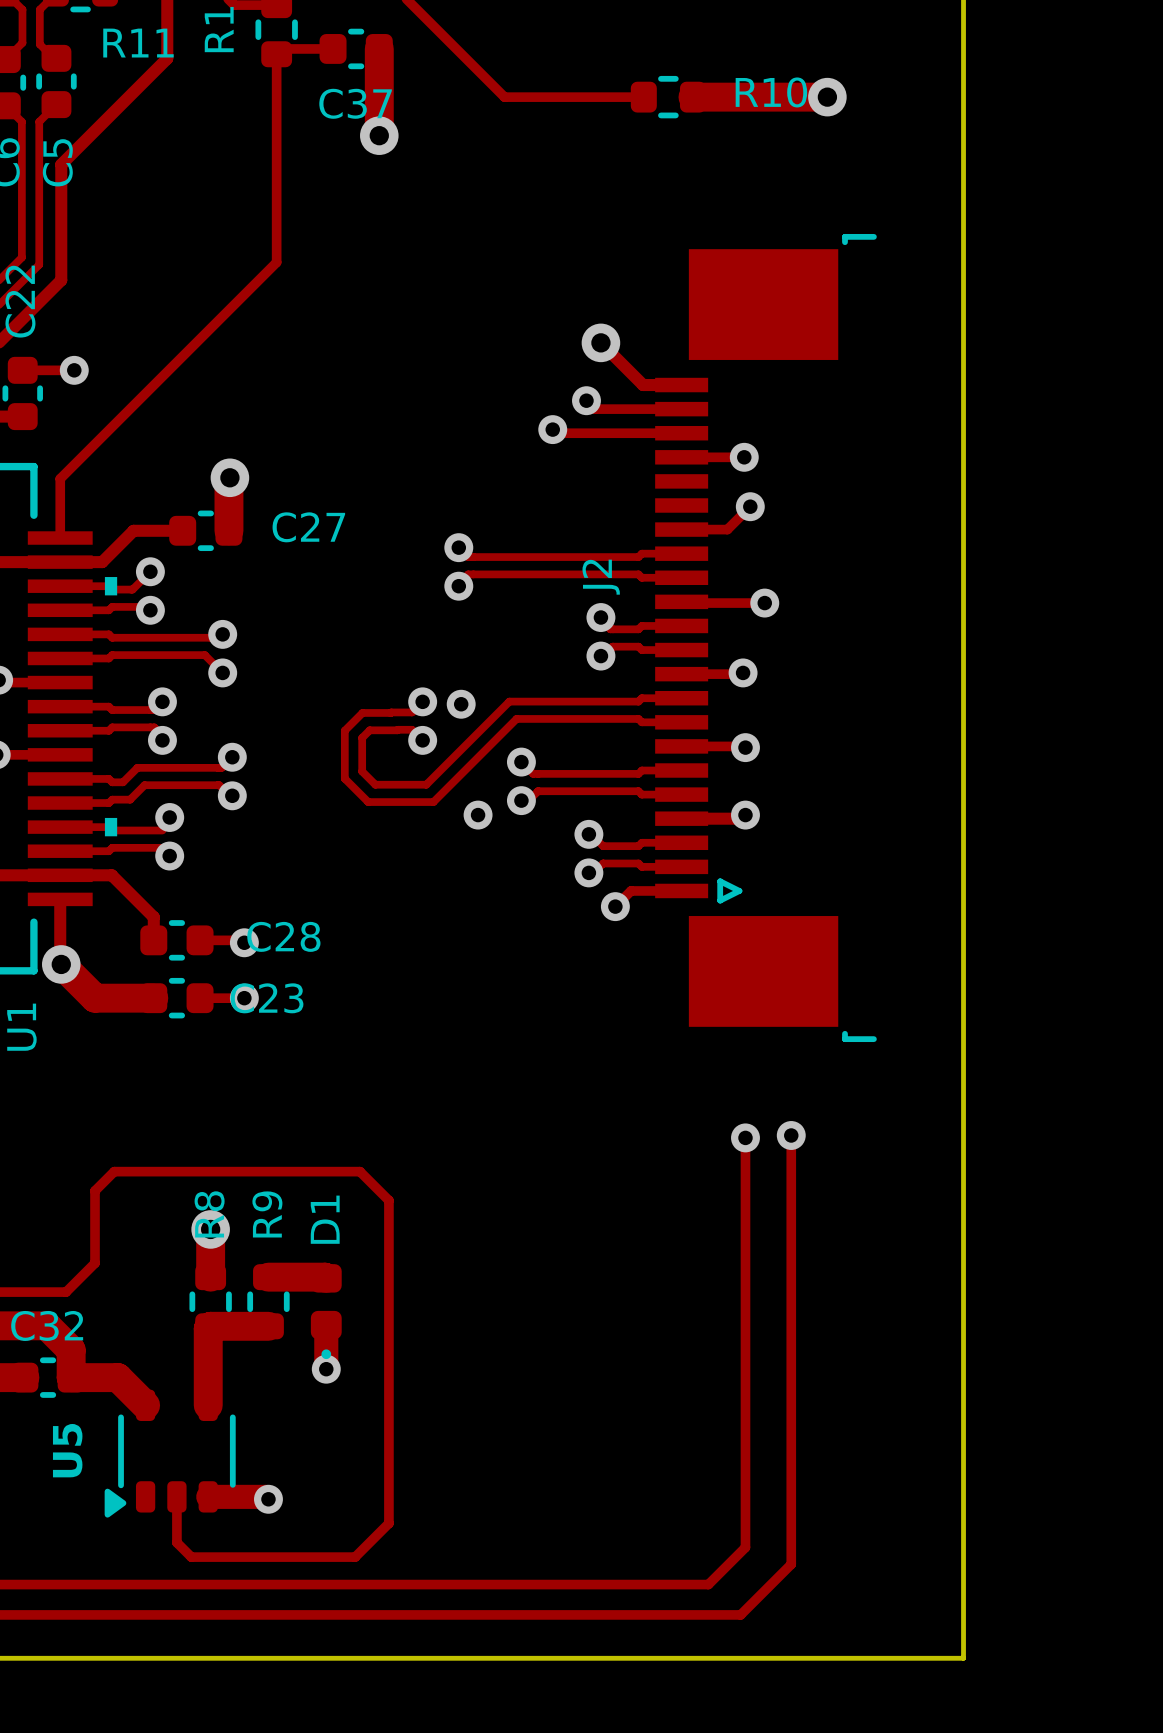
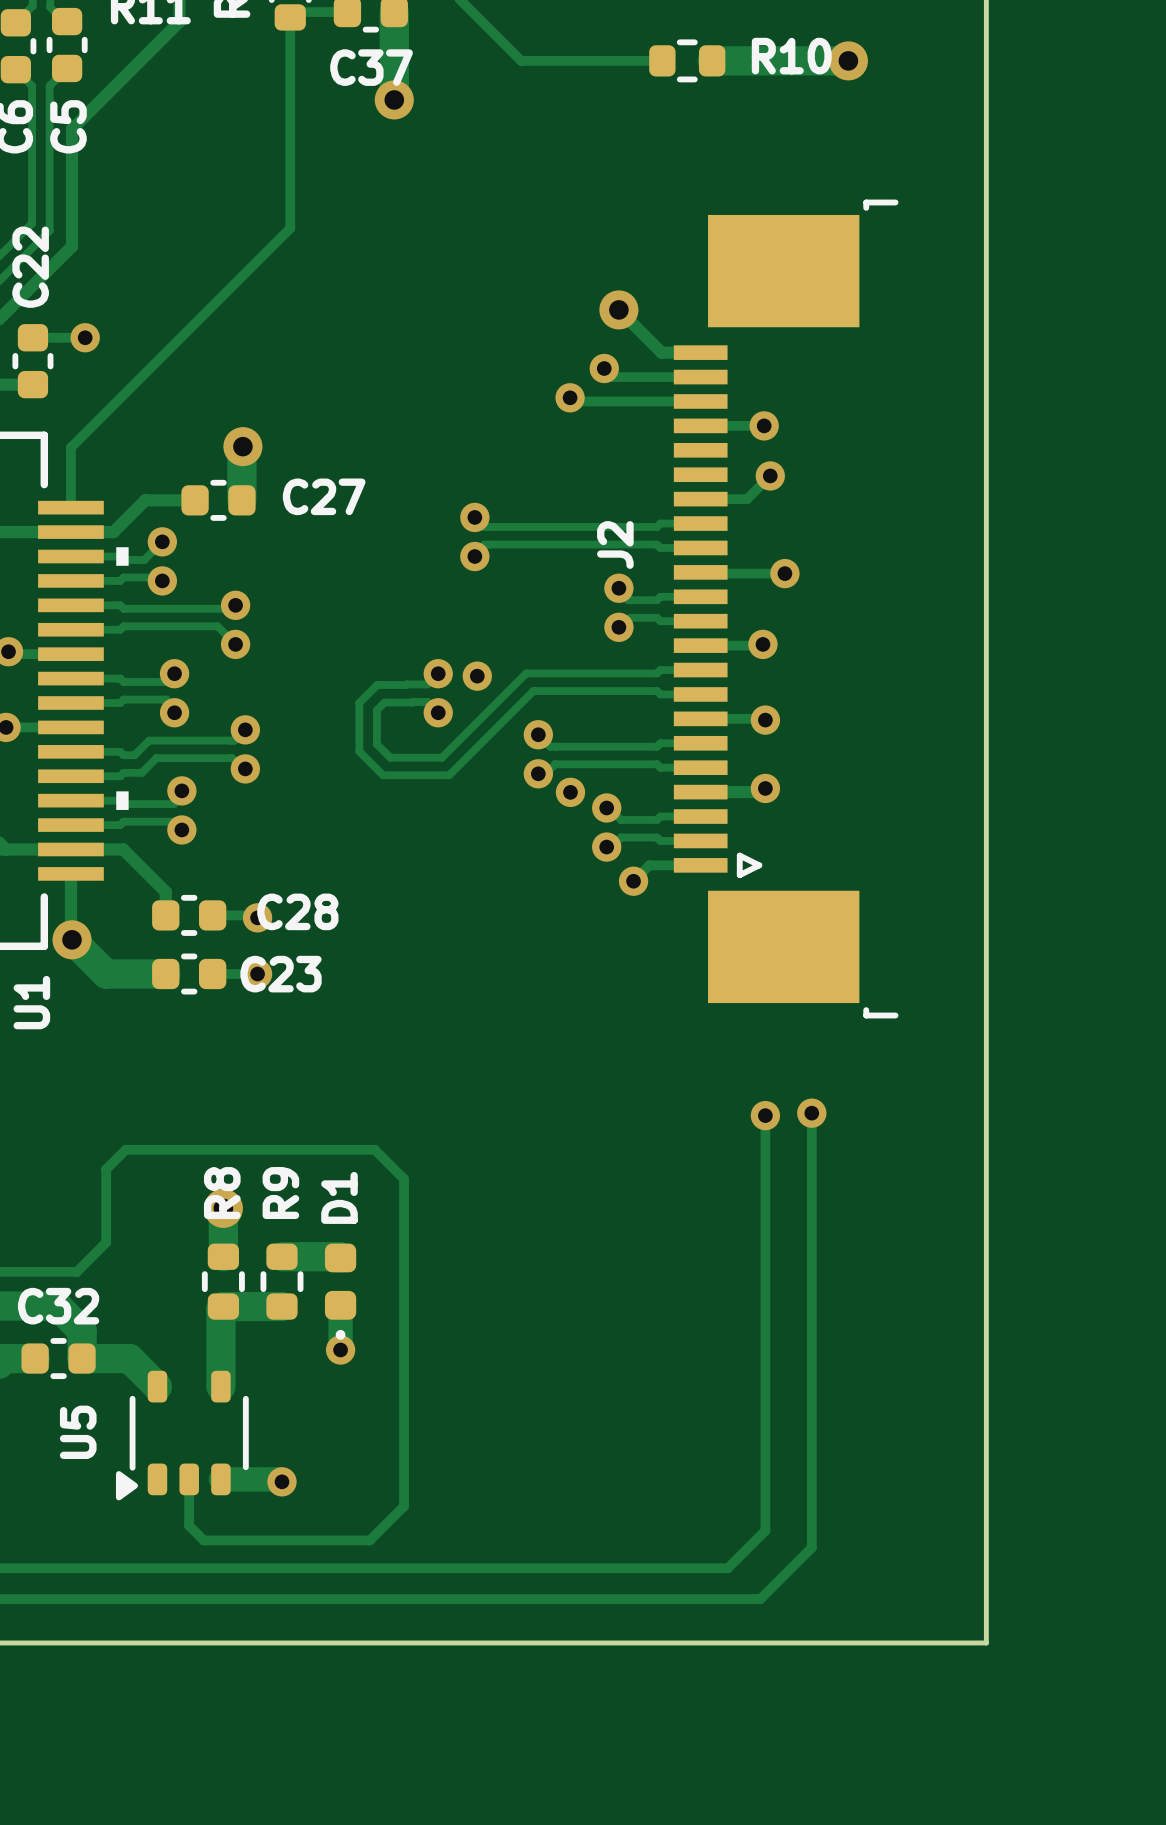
via position: (478, 815) -> (570, 792)

